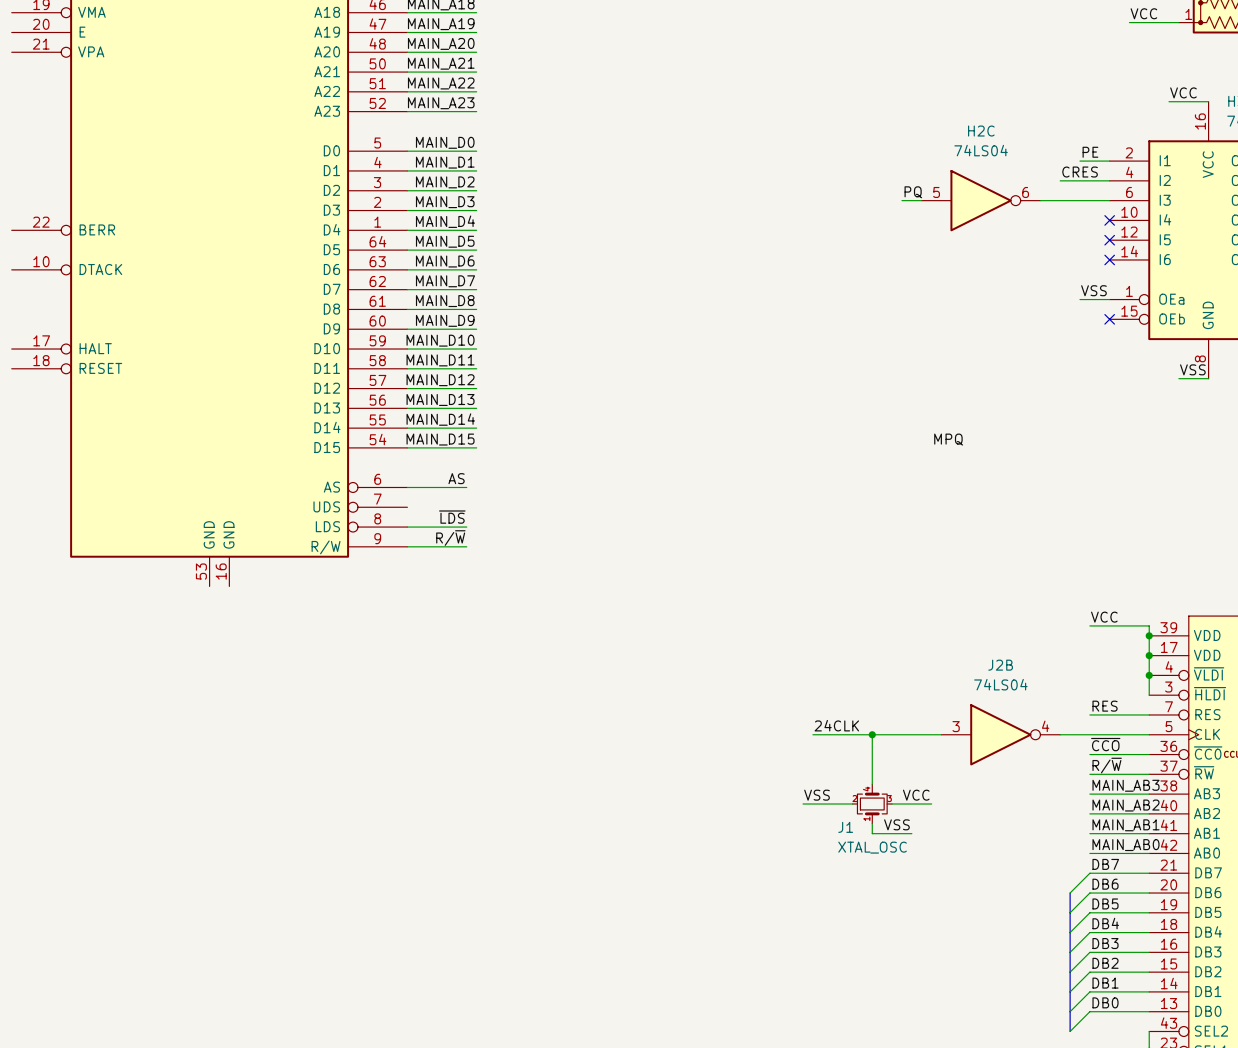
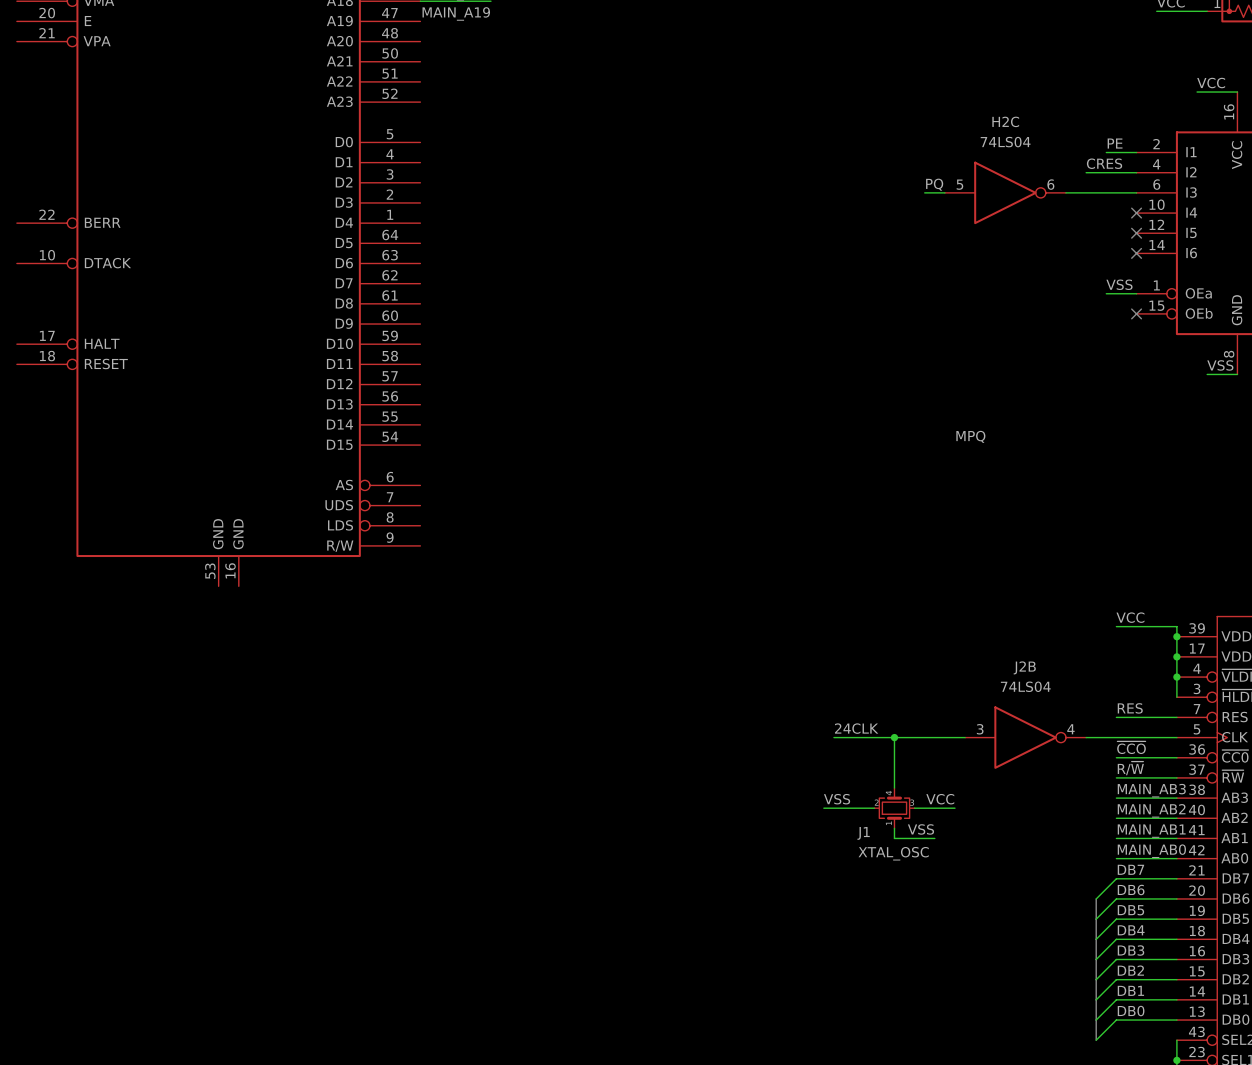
wire: (407, 32) (476, 32) -> none
label: MAIN_A20 (441, 43) -> none
wire: (407, 52) (476, 52) -> none
label: MAIN_A21 (441, 63) -> none
wire: (407, 72) (476, 72) -> none
label: MAIN_A22 (441, 83) -> none
wire: (407, 91) (476, 91) -> none
label: MAIN_A23 (441, 103) -> none
wire: (407, 111) (476, 111) -> none
label: MAIN_D0 (445, 142) -> none
wire: (407, 151) (476, 151) -> none
label: MAIN_D1 (445, 162) -> none
wire: (407, 170) (476, 170) -> none
label: MAIN_D2 (445, 182) -> none
wire: (407, 190) (476, 190) -> none
label: MAIN_D3 (445, 202) -> none
wire: (407, 210) (476, 210) -> none
label: MAIN_D4 (445, 221) -> none
wire: (407, 230) (476, 230) -> none
label: MAIN_D5 (445, 241) -> none
wire: (407, 250) (476, 250) -> none
label: MAIN_D6 (445, 261) -> none
wire: (407, 269) (476, 269) -> none
label: MAIN_D7 (445, 281) -> none
wire: (407, 289) (476, 289) -> none
label: MAIN_D8 (445, 301) -> none
wire: (407, 309) (476, 309) -> none
label: MAIN_D9 (445, 320) -> none
wire: (407, 329) (476, 329) -> none
label: MAIN_D10 (440, 340) -> none
wire: (407, 349) (476, 349) -> none
label: MAIN_D11 (440, 360) -> none
wire: (407, 368) (476, 368) -> none
label: MAIN_D12 (440, 380) -> none
wire: (407, 388) (476, 388) -> none
label: MAIN_D13 (440, 399) -> none
wire: (407, 408) (476, 408) -> none
label: MAIN_D14 (440, 419) -> none
wire: (407, 428) (476, 428) -> none
label: MAIN_D15 (440, 439) -> none
wire: (407, 447) (476, 447) -> none
label: AS (456, 478) -> none
wire: (407, 487) (466, 487) -> none
label: ~{LDS} (452, 517) -> none
wire: (407, 527) (466, 527) -> none
label: R/~{W} (450, 538) -> none
wire: (407, 546) (466, 546) -> none

